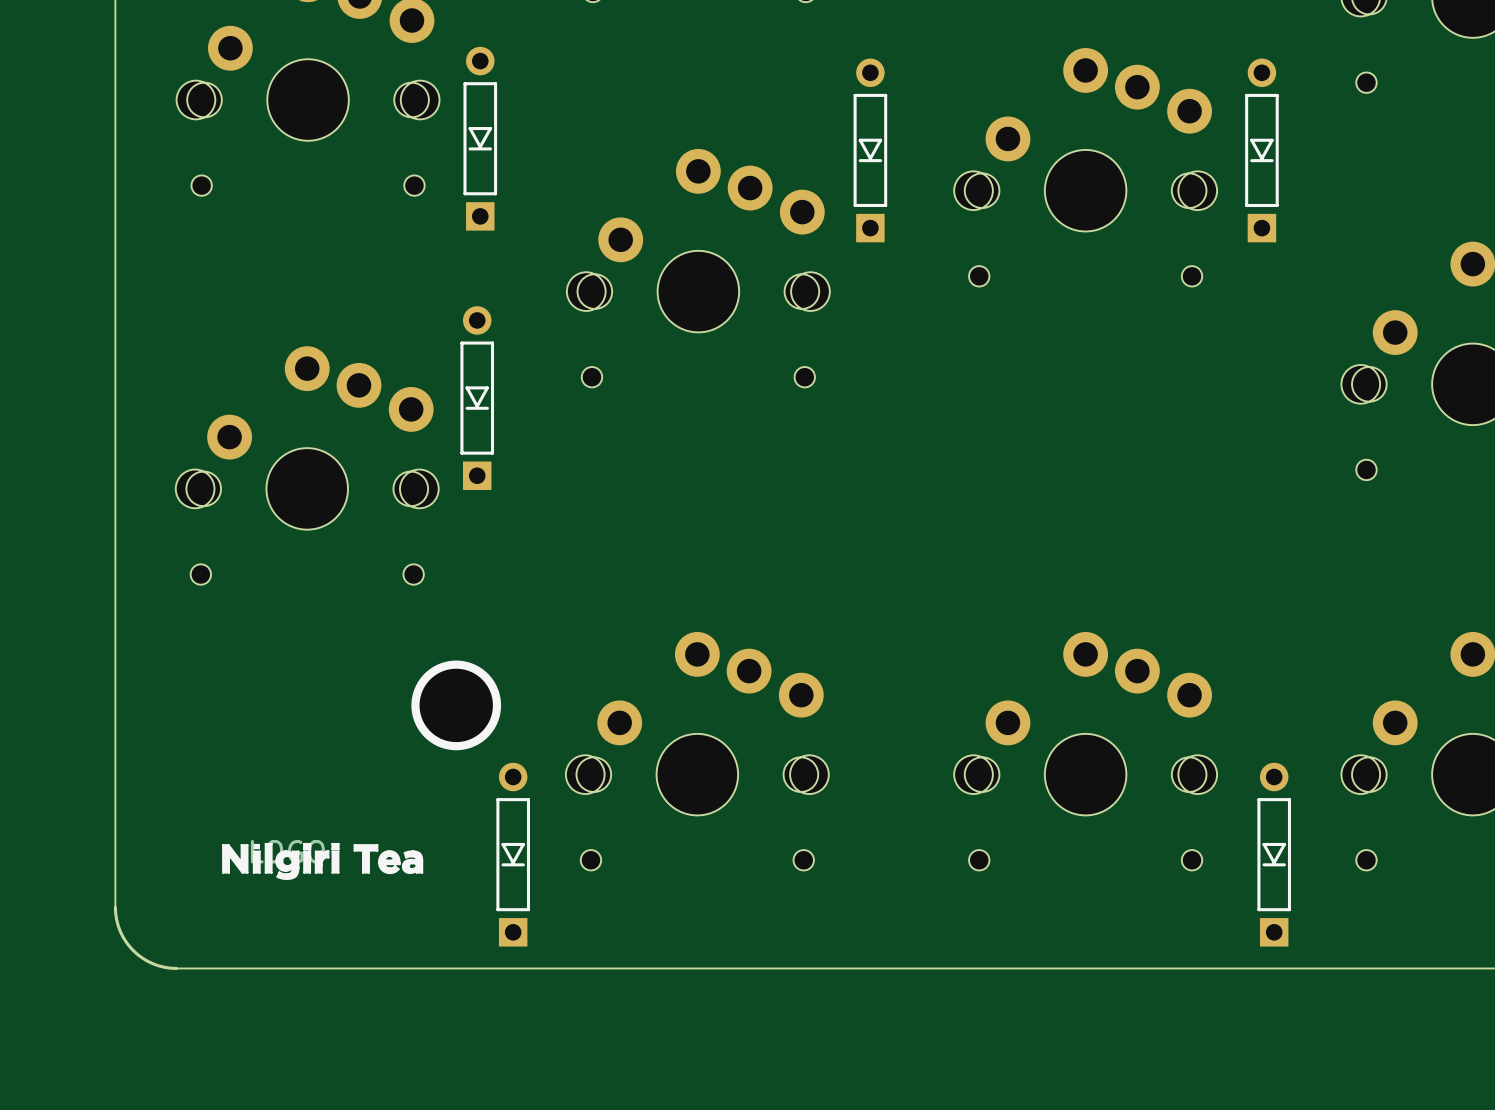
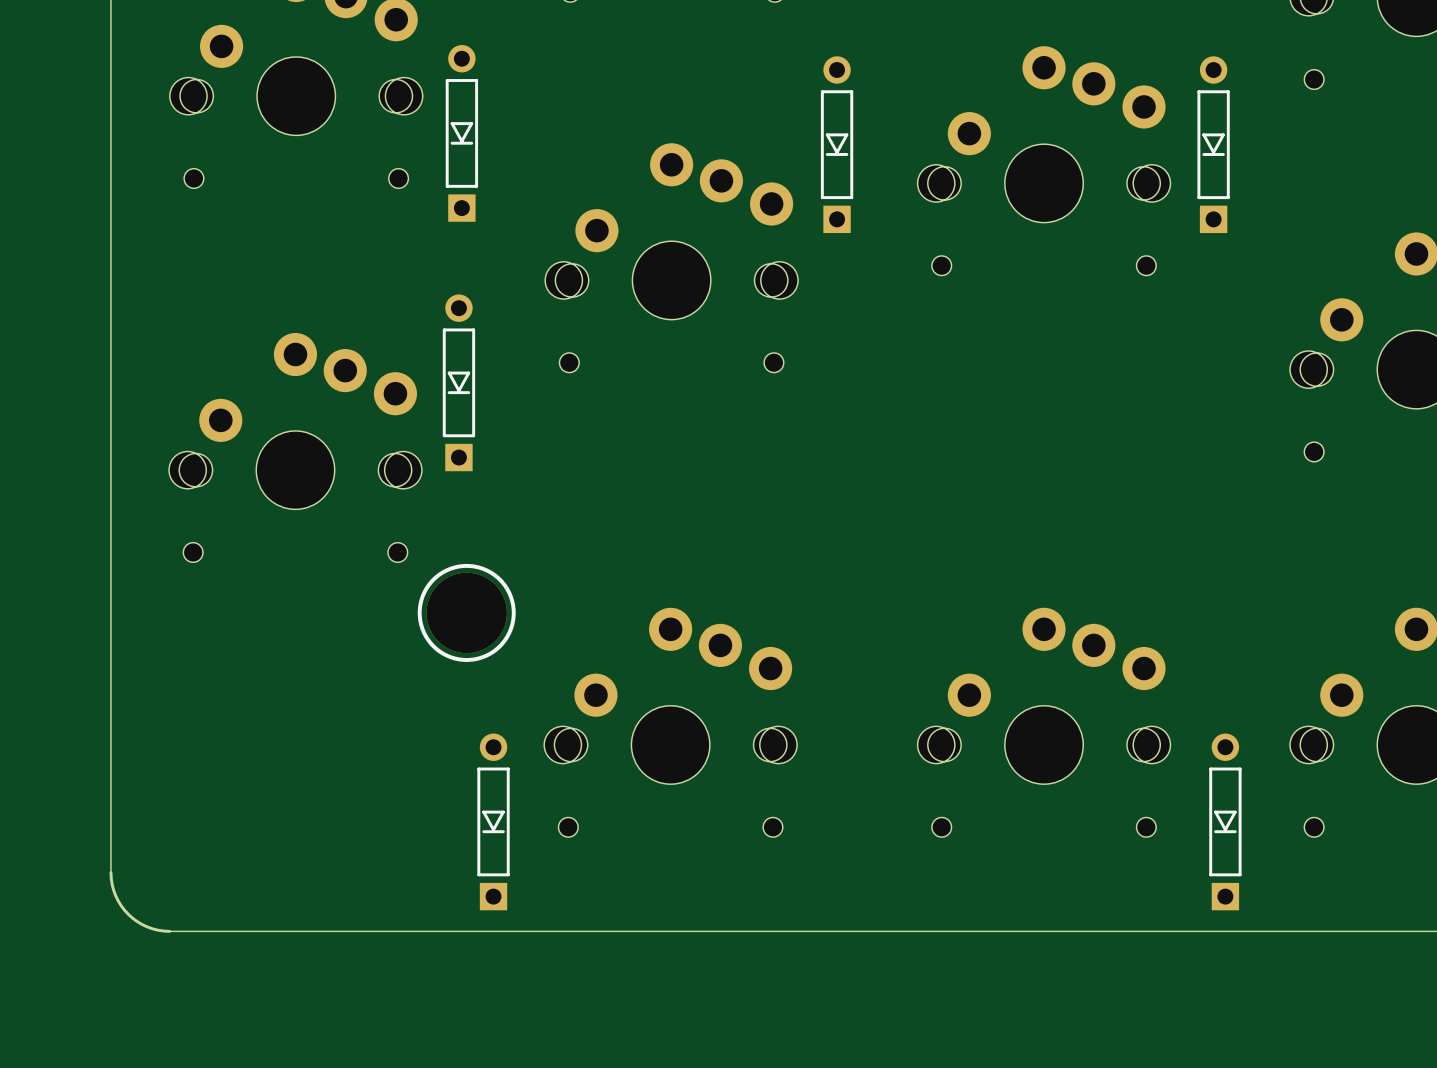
part: none -> (466, 612)
part: (456, 705) -> none
drawing: [222, 843, 423, 880] -> none

